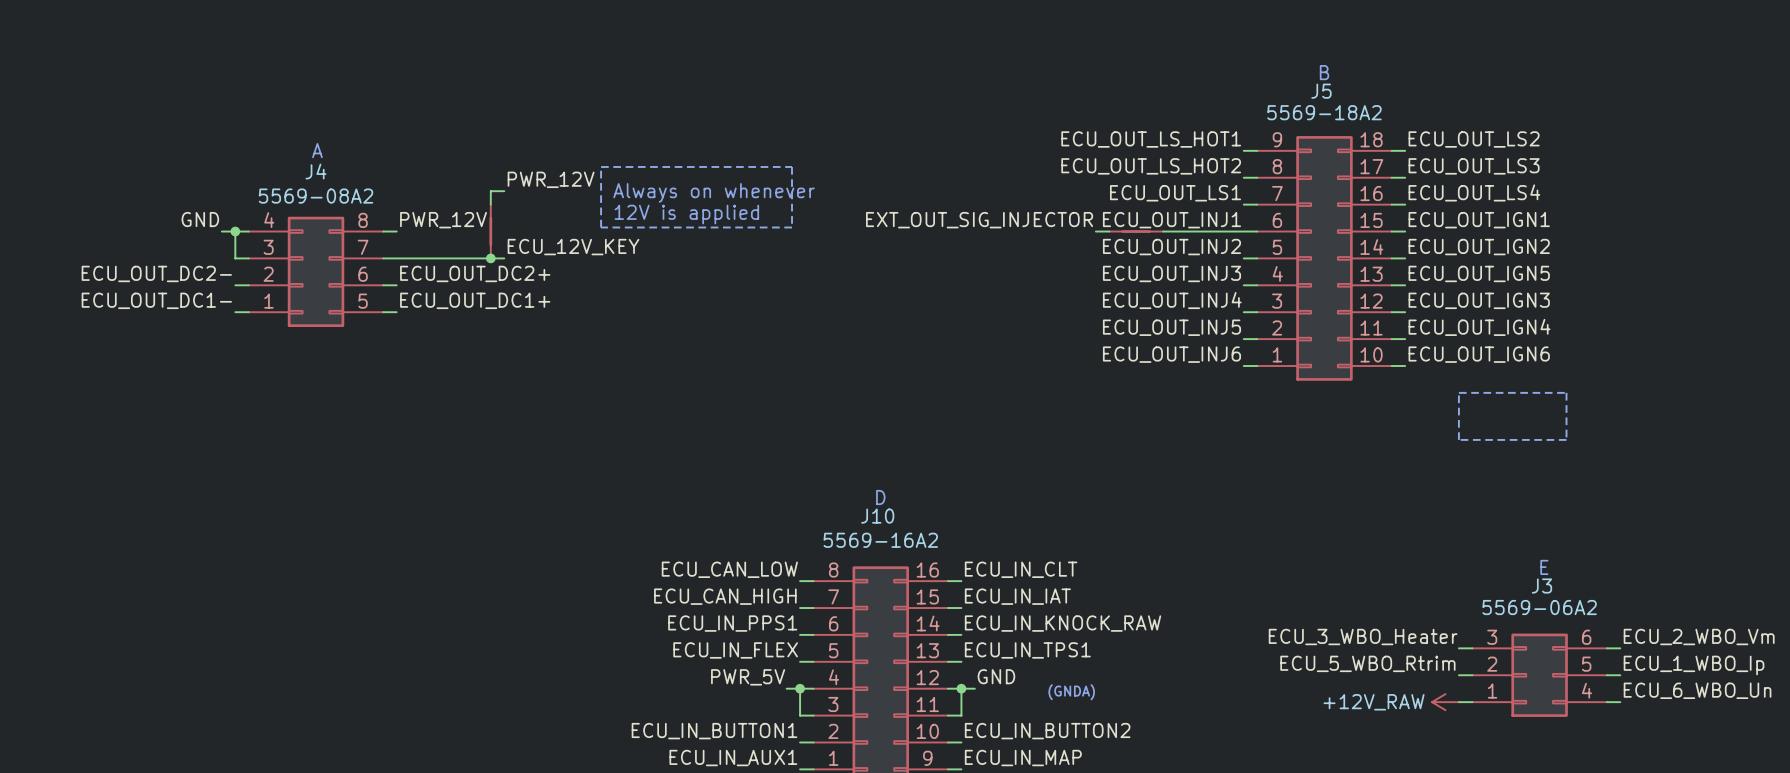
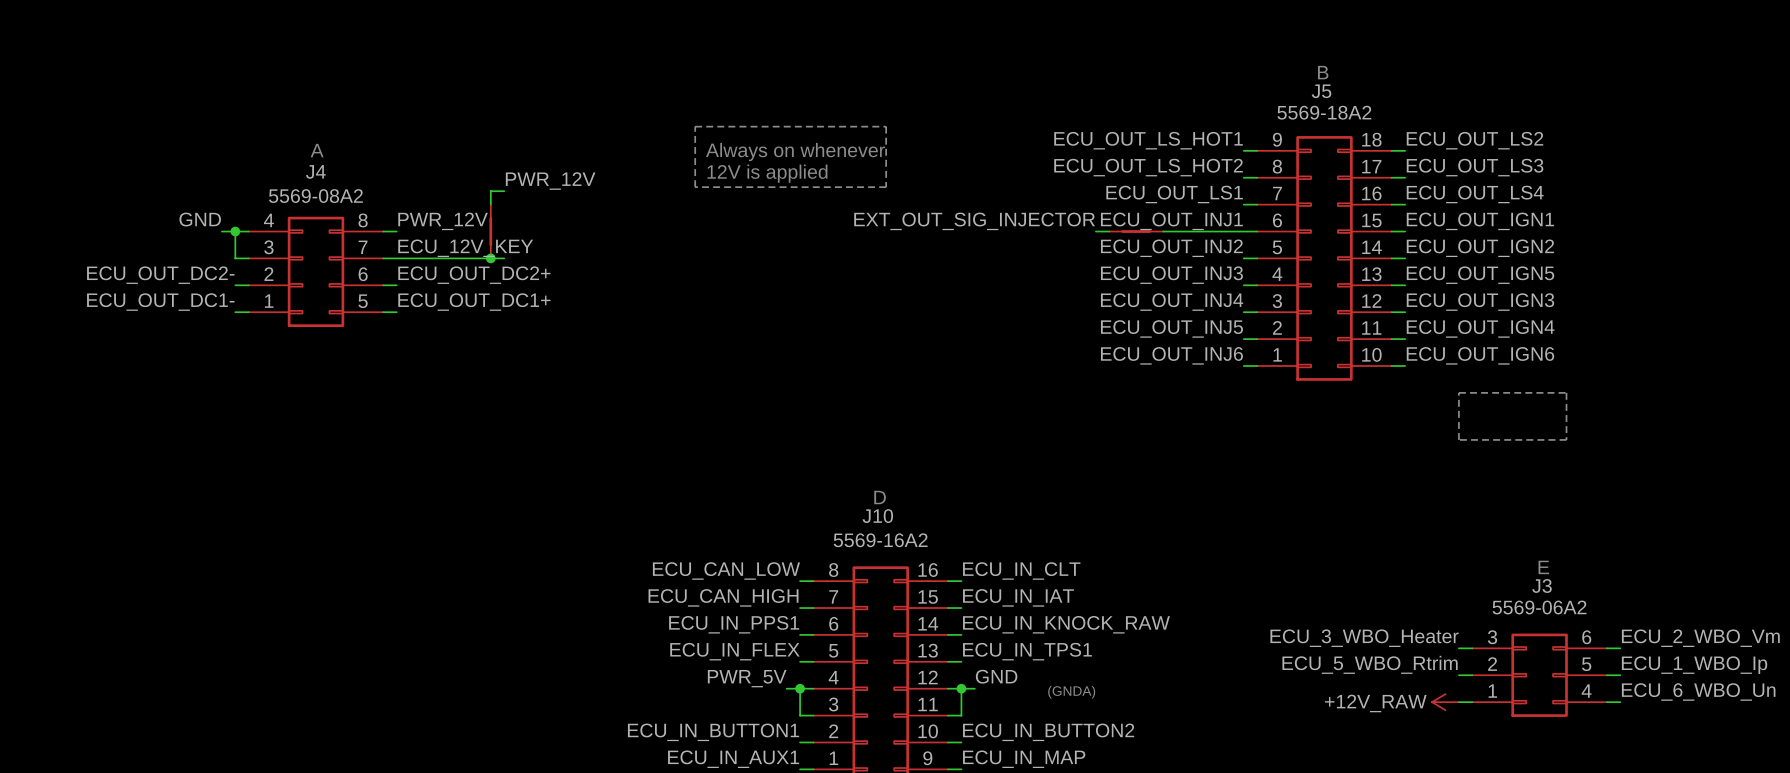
line: (601, 166) (792, 166) (792, 227) (601, 227) (601, 166) -> (695, 126) (886, 126) (886, 187) (695, 187) (695, 126)
text position: Always on whenever (714, 192) -> Always on whenever (795, 151)
text position: 12V is applied (686, 214) -> 12V is applied (767, 173)
label position: ECU_12V_KEY (573, 247) -> ECU_12V_KEY (465, 248)

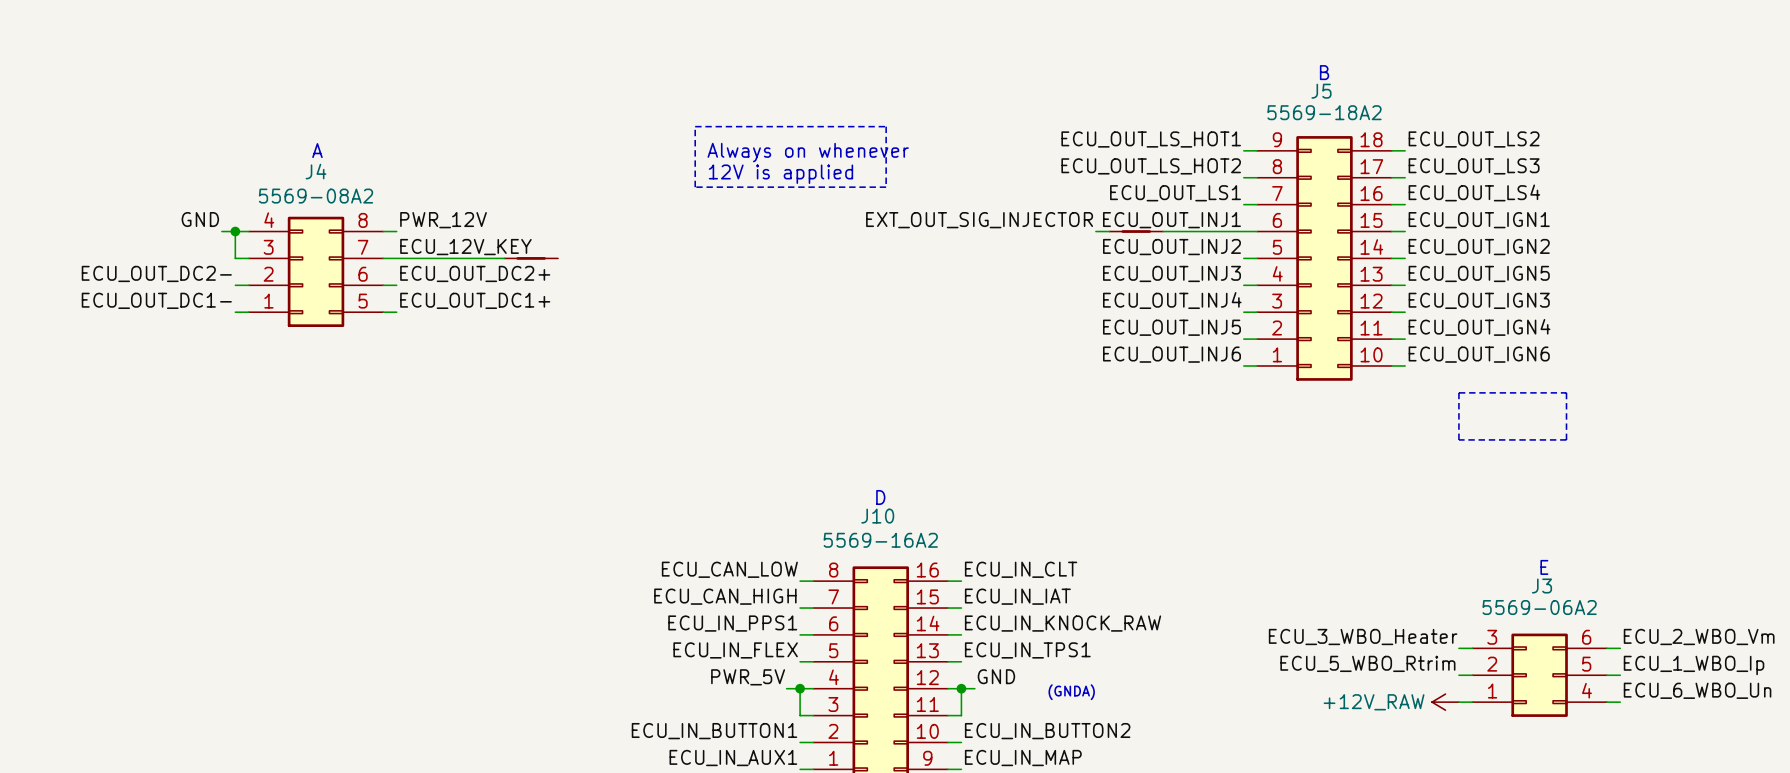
label: PWR_12V (550, 181) -> none
wire: (504, 191) (490, 191) (490, 204) -> none
part rotation: 0° (490, 231) -> 90° clockwise (531, 258)
part position: (490, 231) -> (531, 258)
junction: (490, 258) -> none

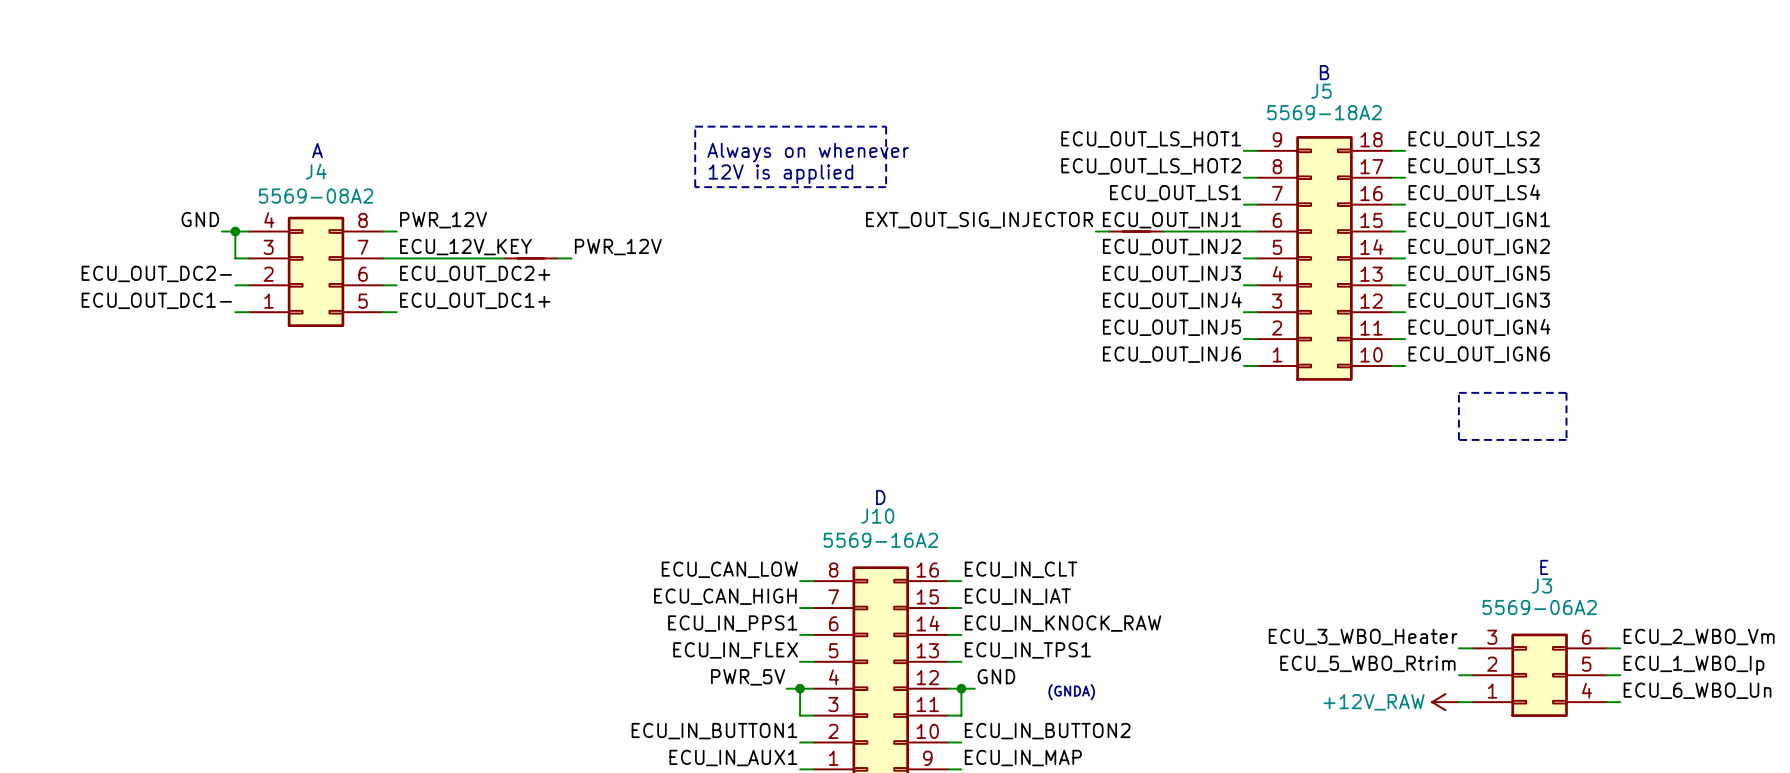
label: none -> PWR_12V (618, 247)
wire: none -> (558, 258) (571, 258)

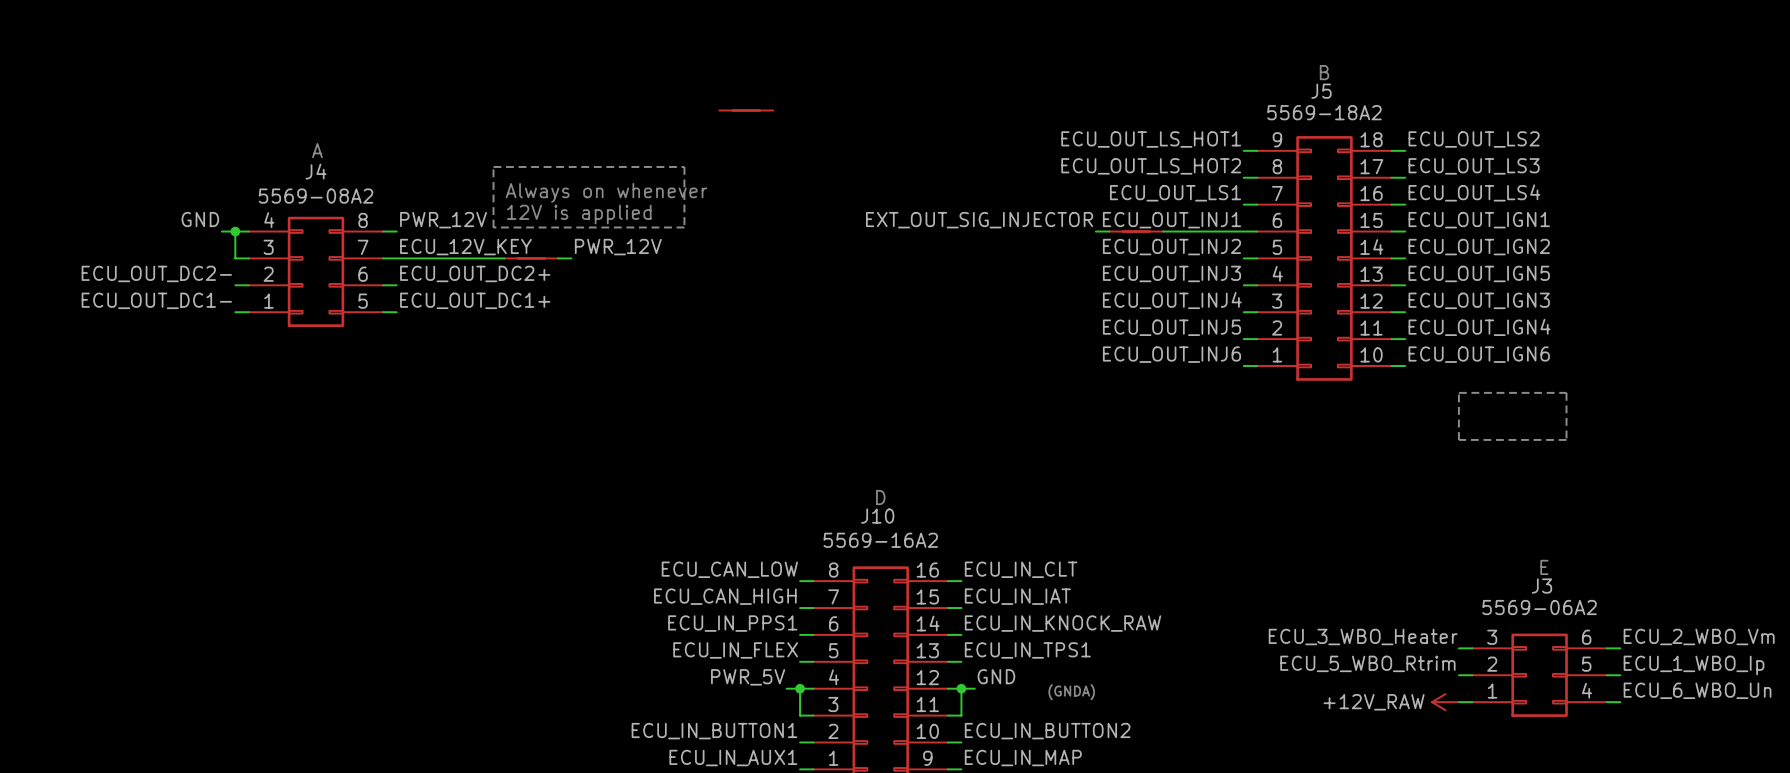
part: none -> (746, 110)
line: (695, 126) (886, 126) (886, 187) (695, 187) (695, 126) -> (493, 166) (684, 166) (684, 227) (493, 227) (493, 166)
text position: Always on whenever (808, 152) -> Always on whenever (606, 192)
text position: 12V is applied (780, 174) -> 12V is applied (579, 214)

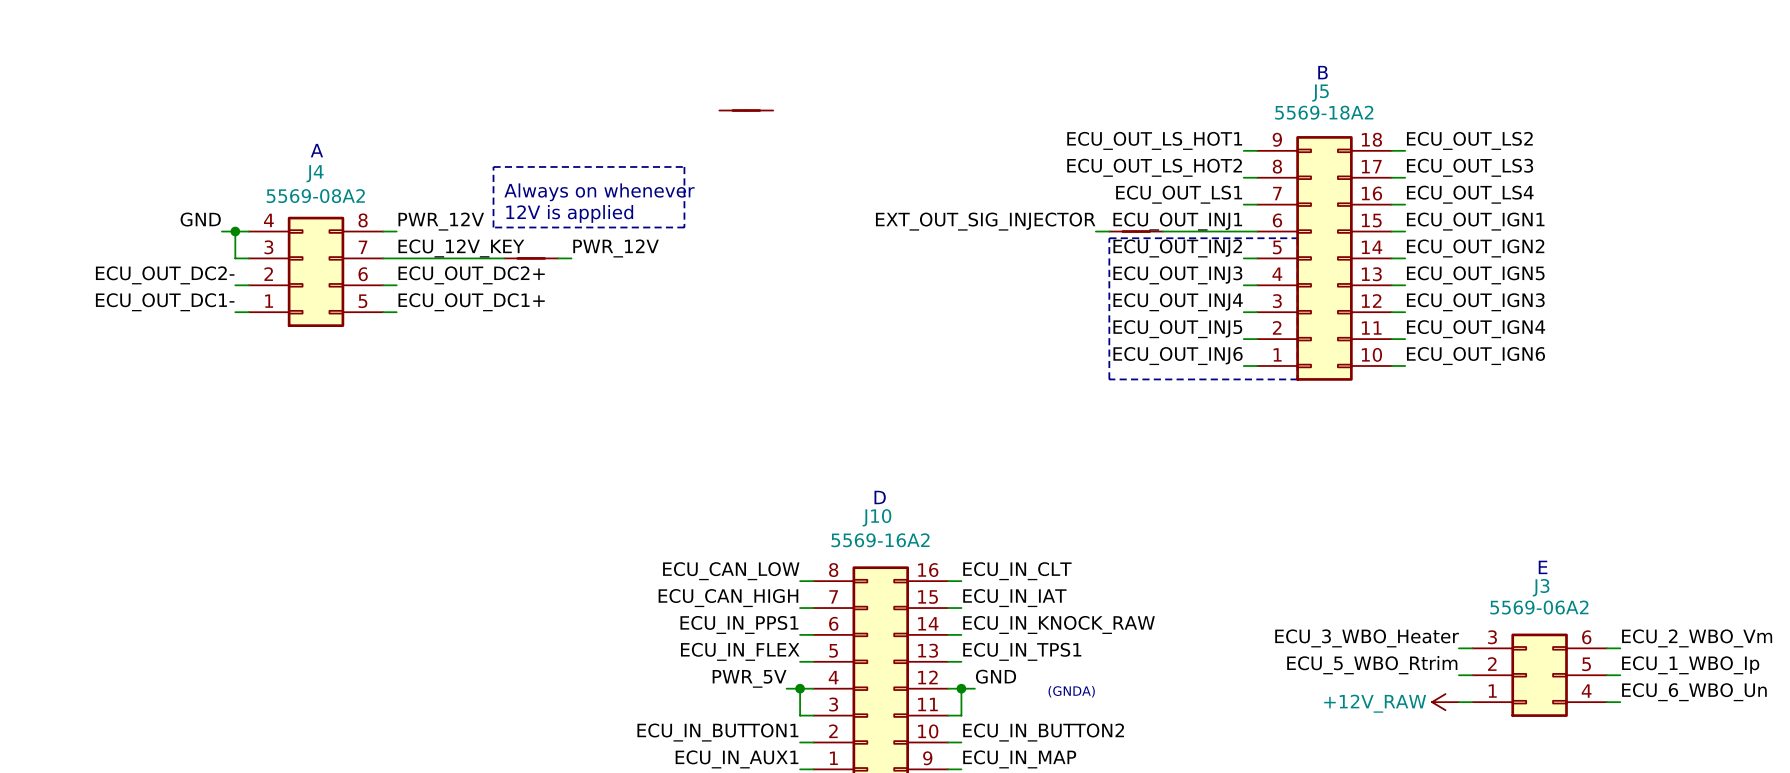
line: none -> (1109, 238) (1297, 238) (1297, 379) (1109, 379) (1109, 238)
line: (1458, 392) (1566, 392) (1566, 439) (1458, 439) (1458, 392) -> none

